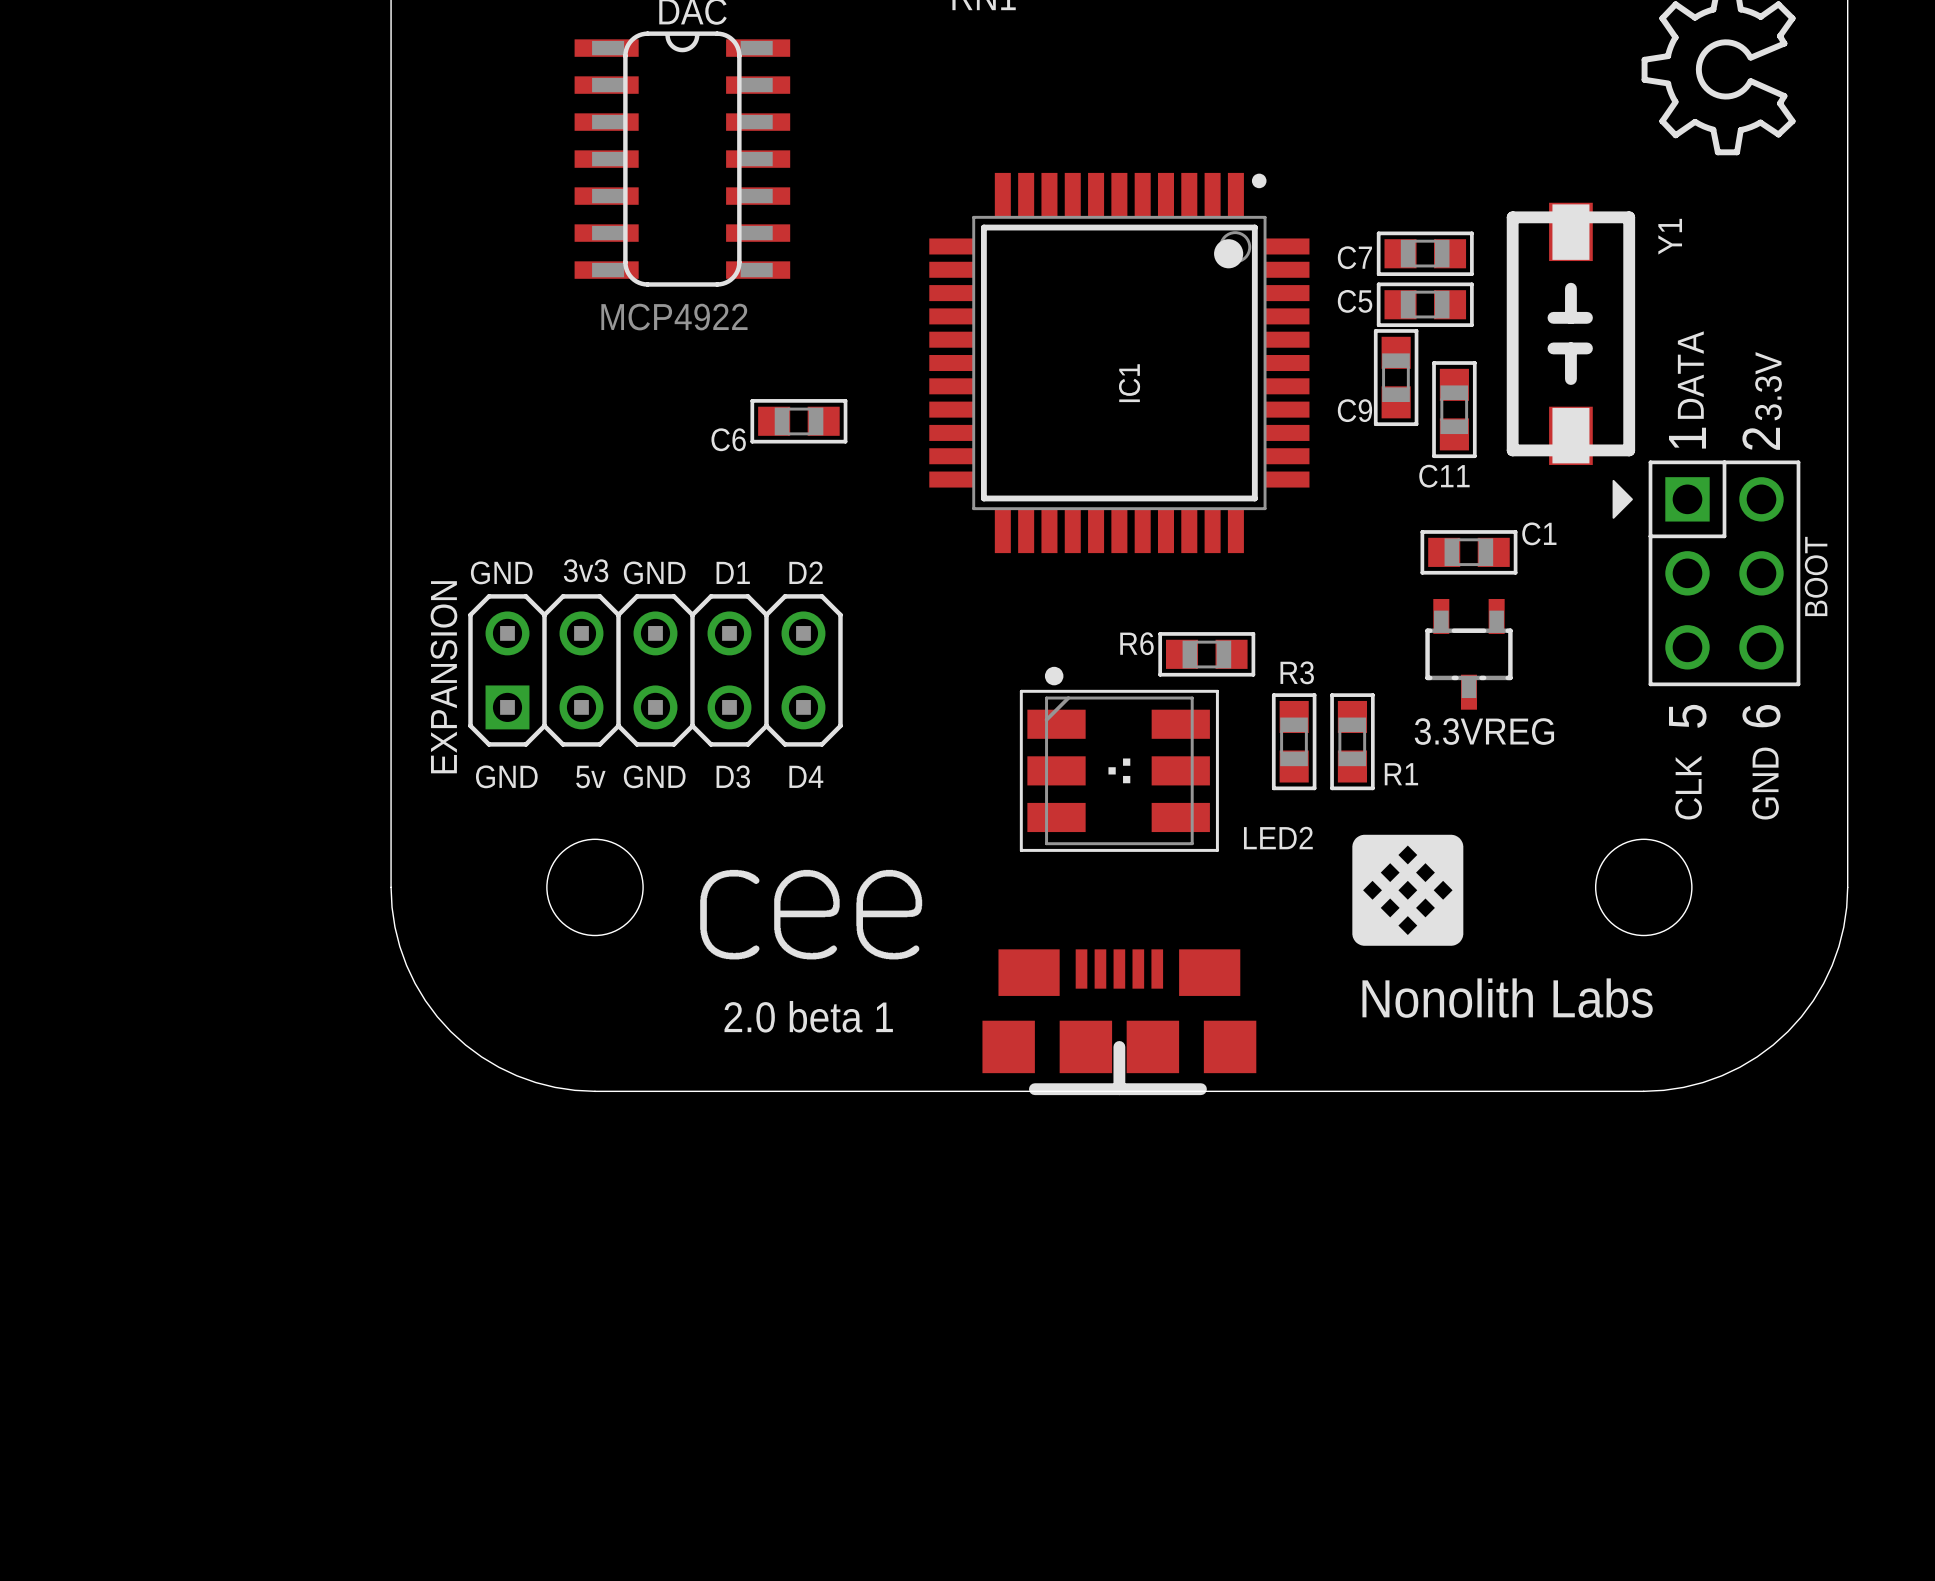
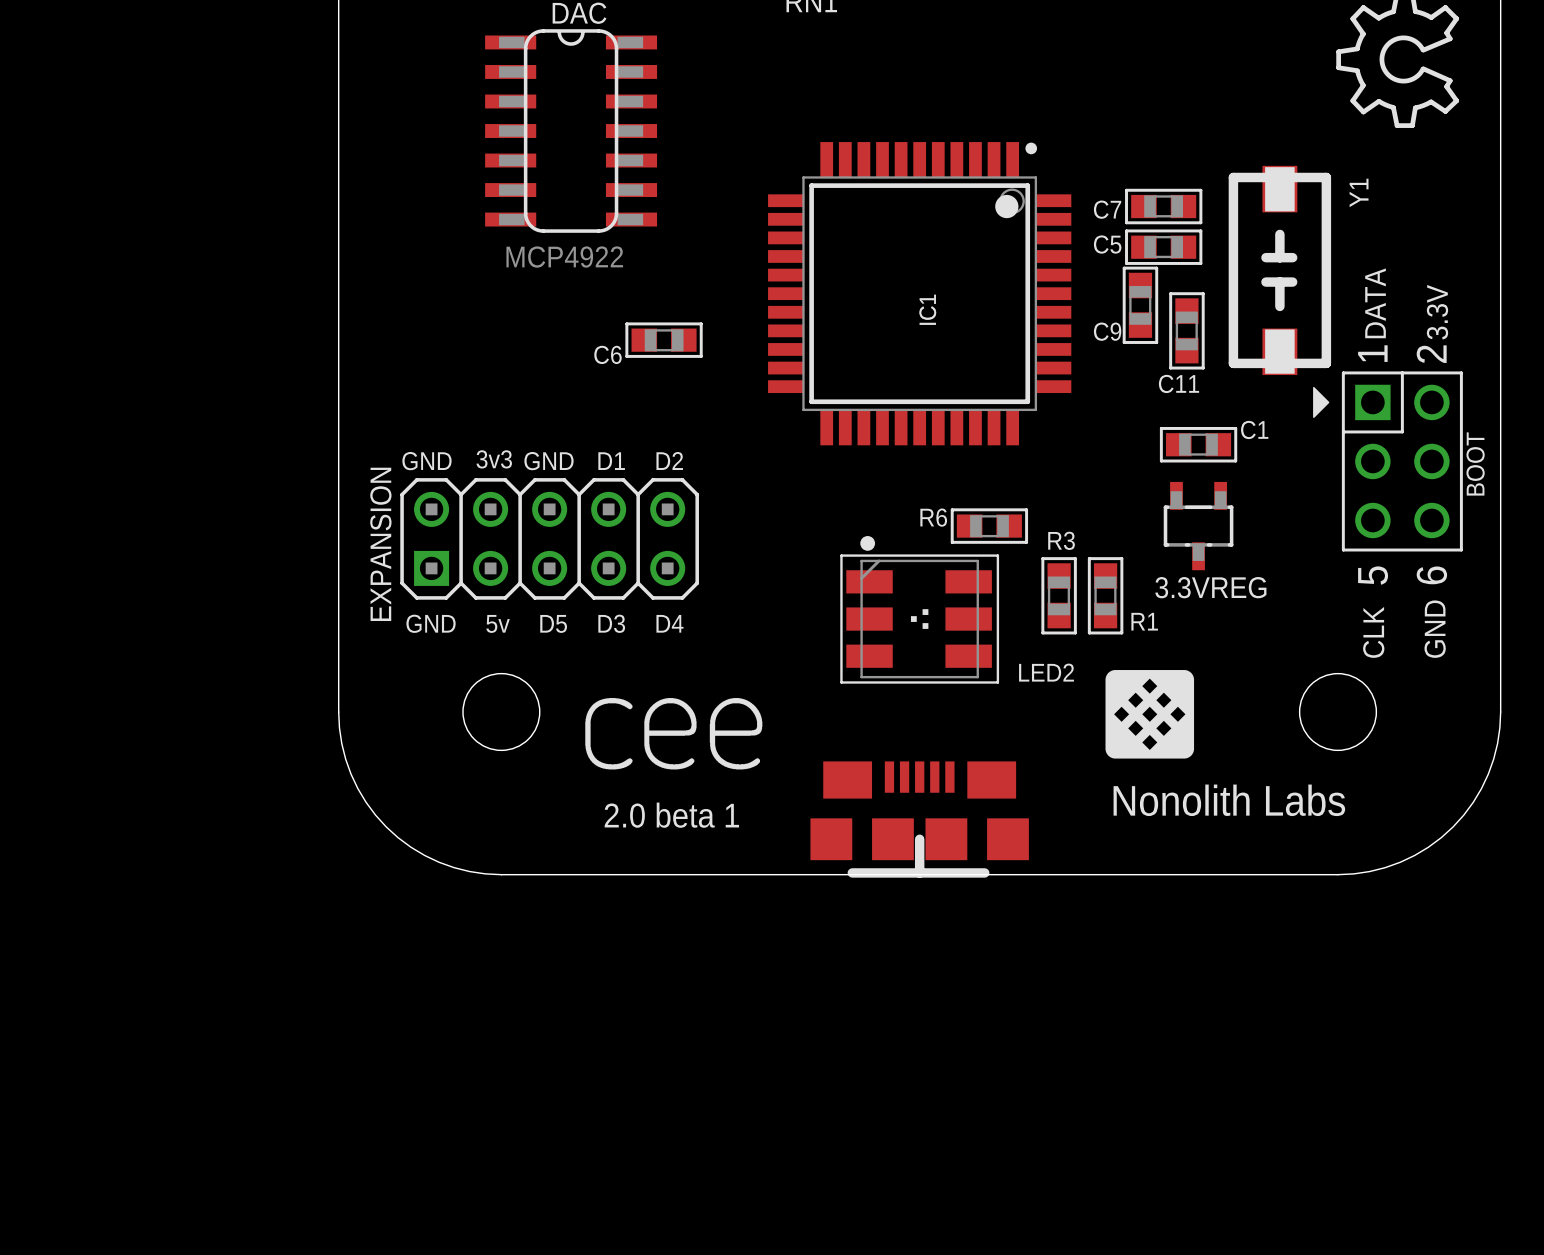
text: GND (654, 776) -> D5 (553, 623)

